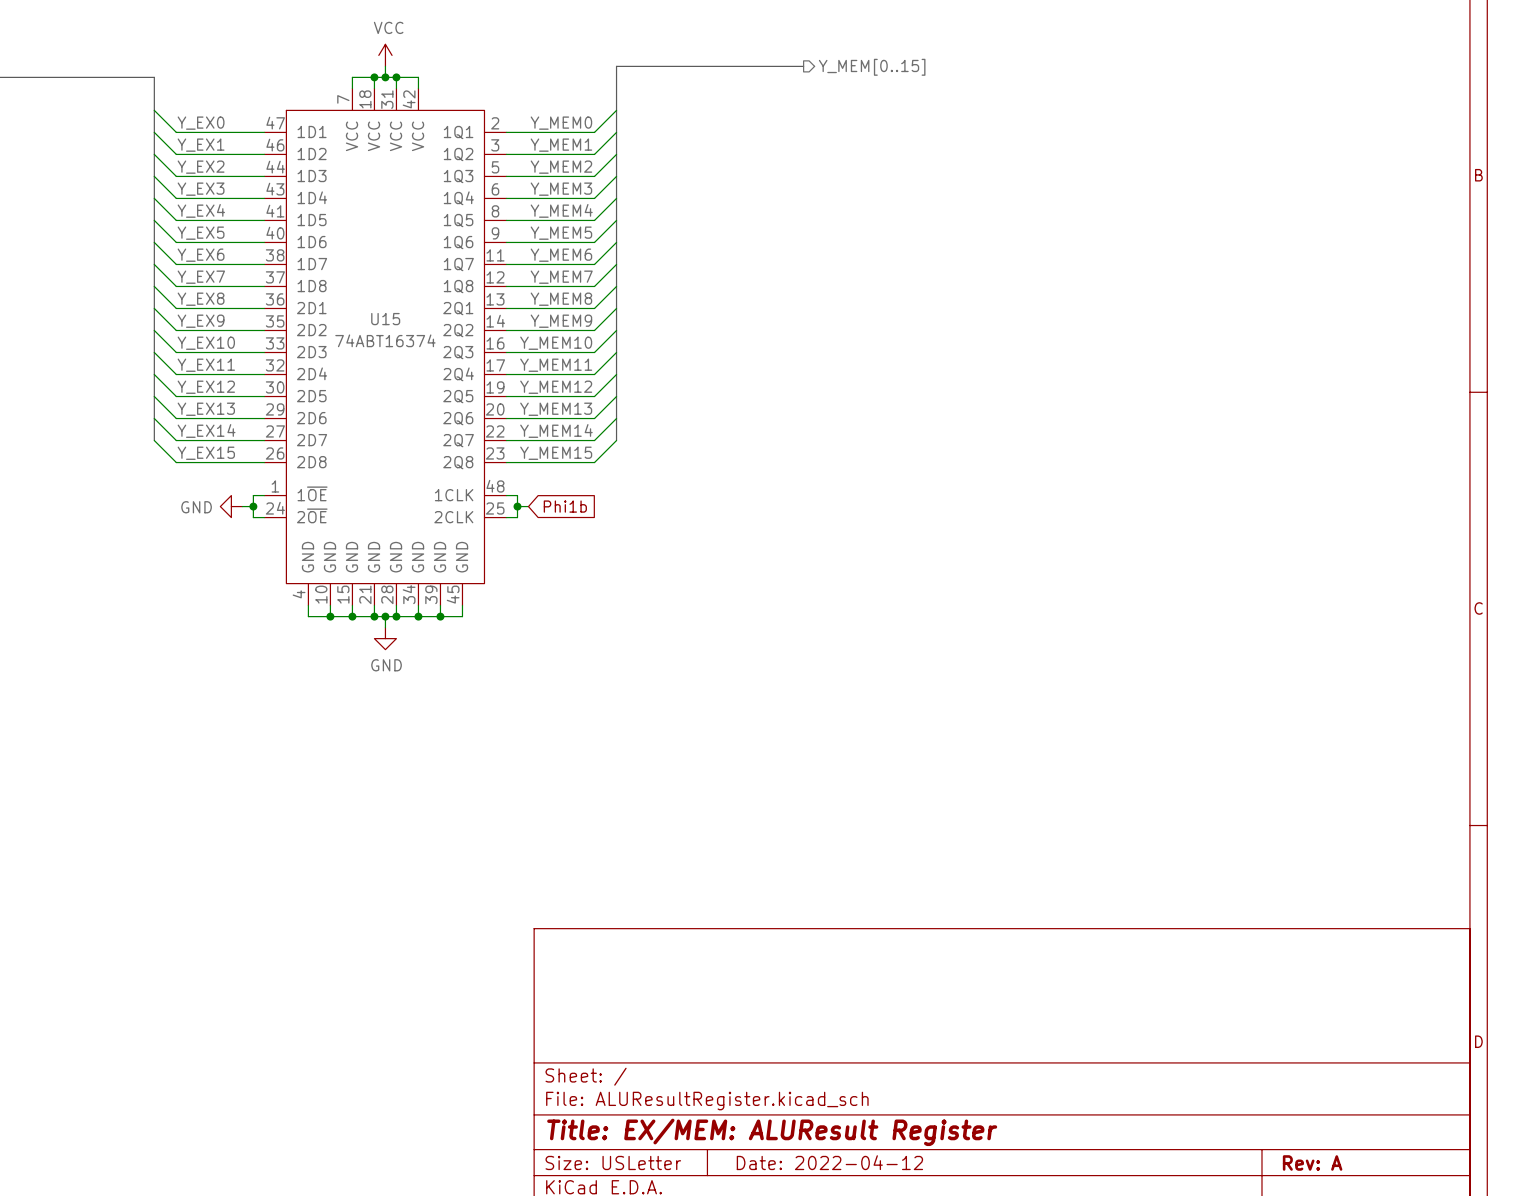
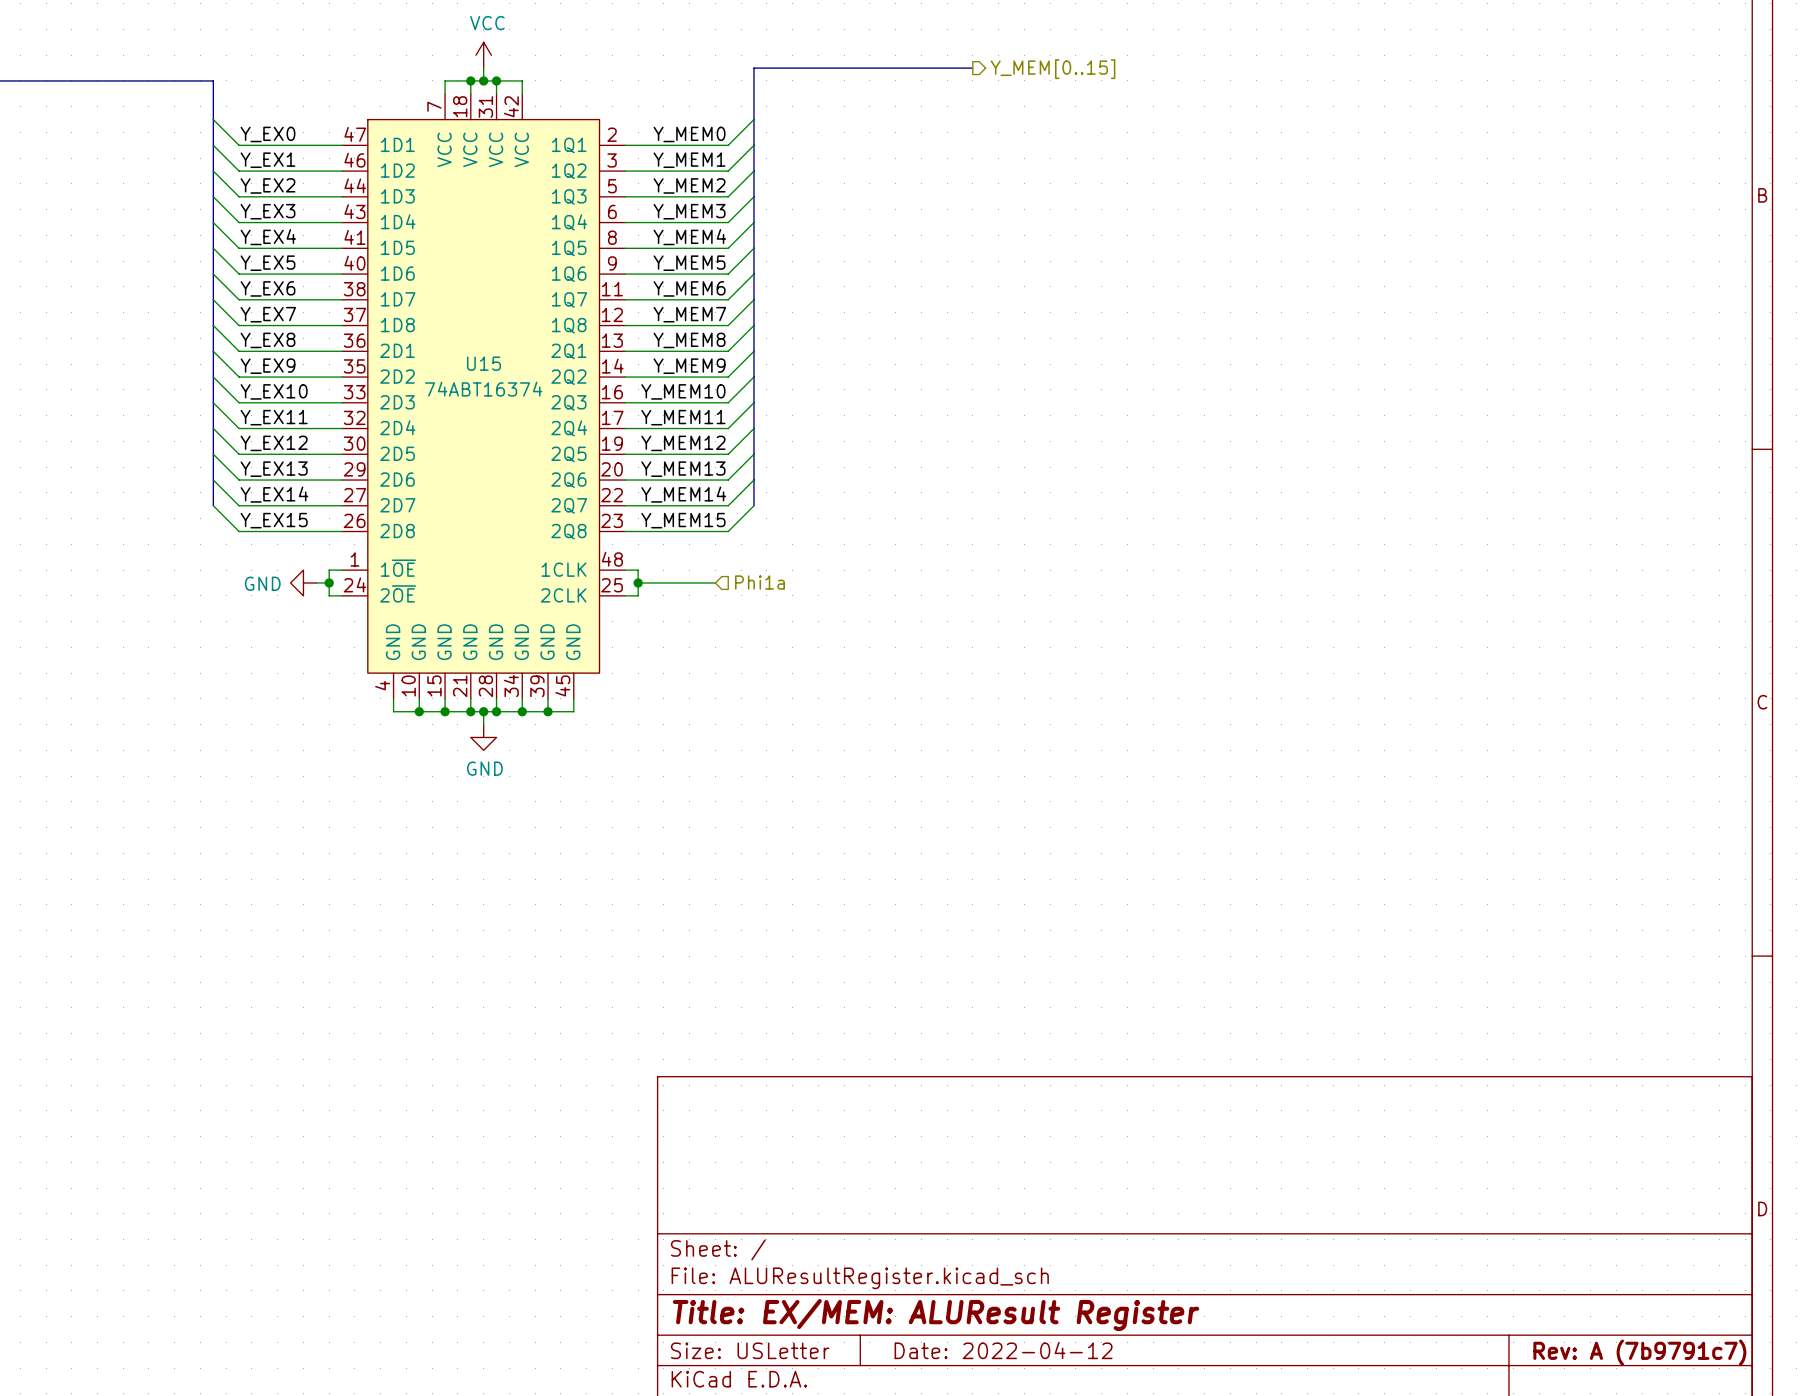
wire: none -> (651, 583) (715, 583)
global label: Phi1b (565, 506) -> none
hierarchical label: none -> Phi1a (760, 582)
title block: Rev: A (1312, 1162) -> Rev: A (7b9791c7) (1639, 1352)

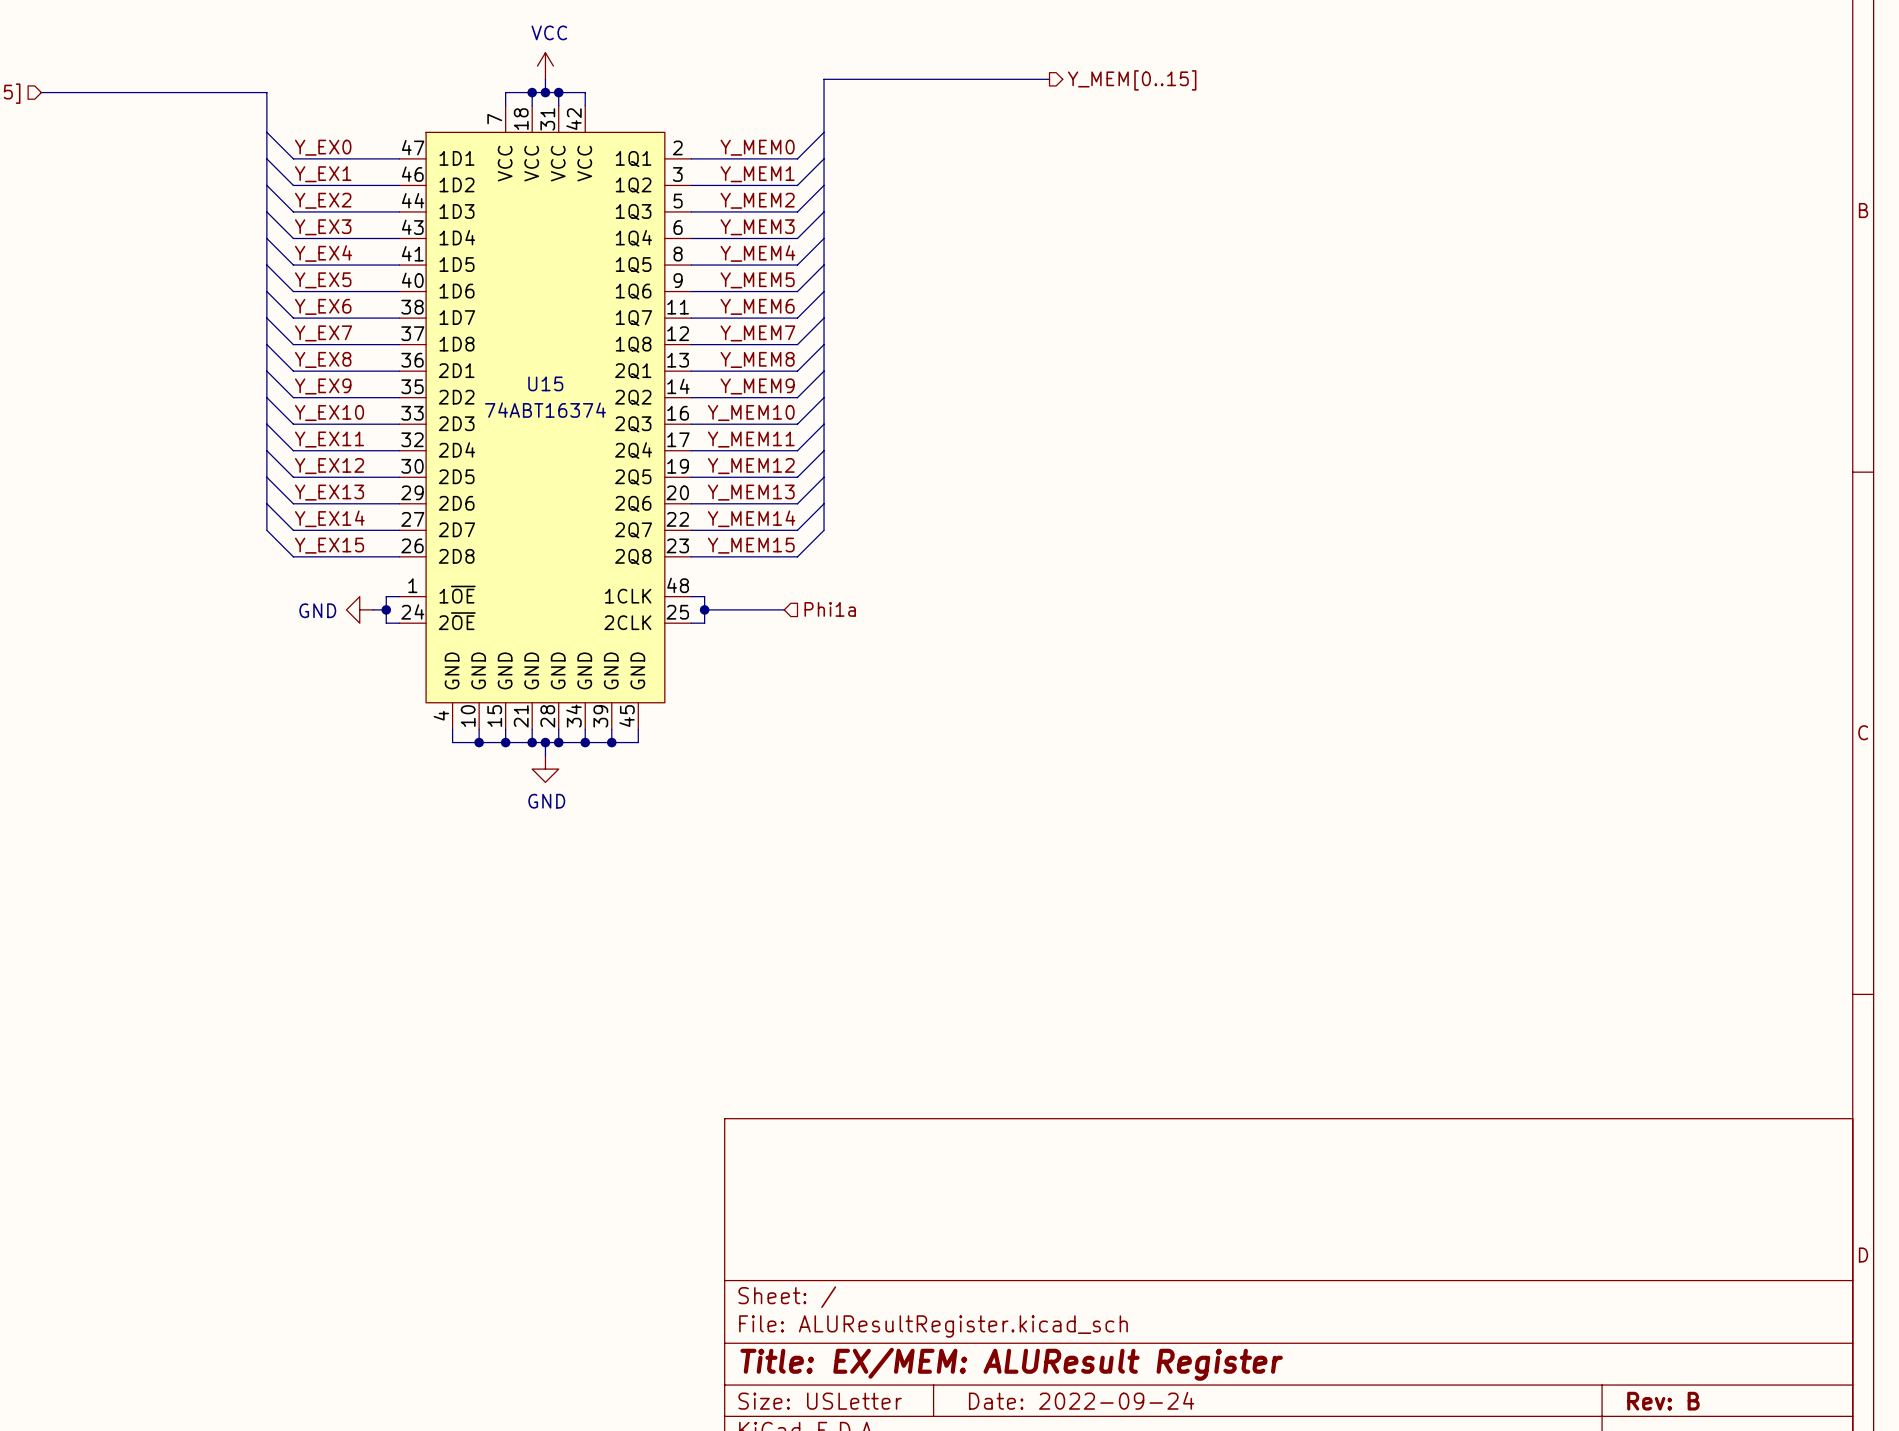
title block: Date: 2022-04-12 (1003, 1350) -> Date: 2022-09-24 (1081, 1400)
title block: Rev: A (7b9791c7) (1639, 1352) -> Rev: B (1663, 1401)

